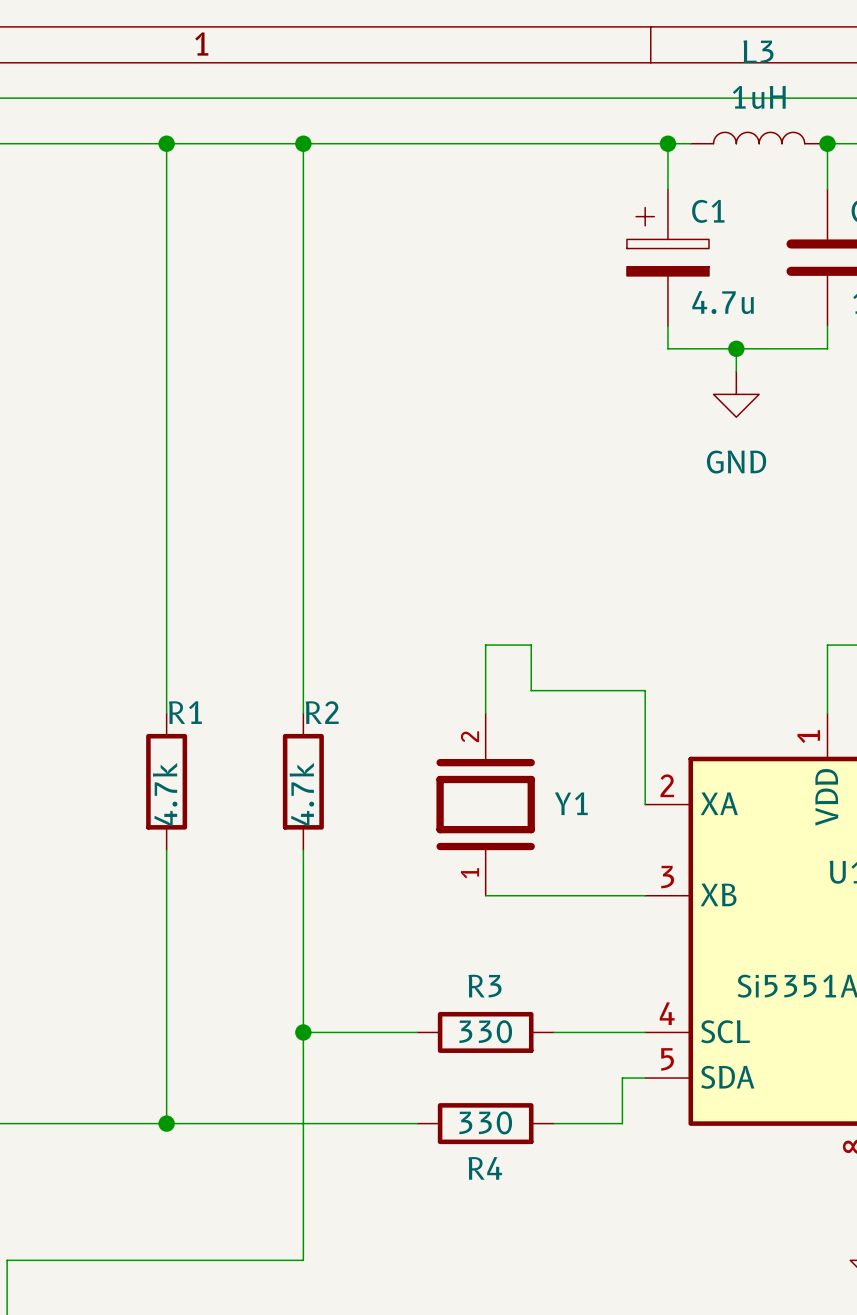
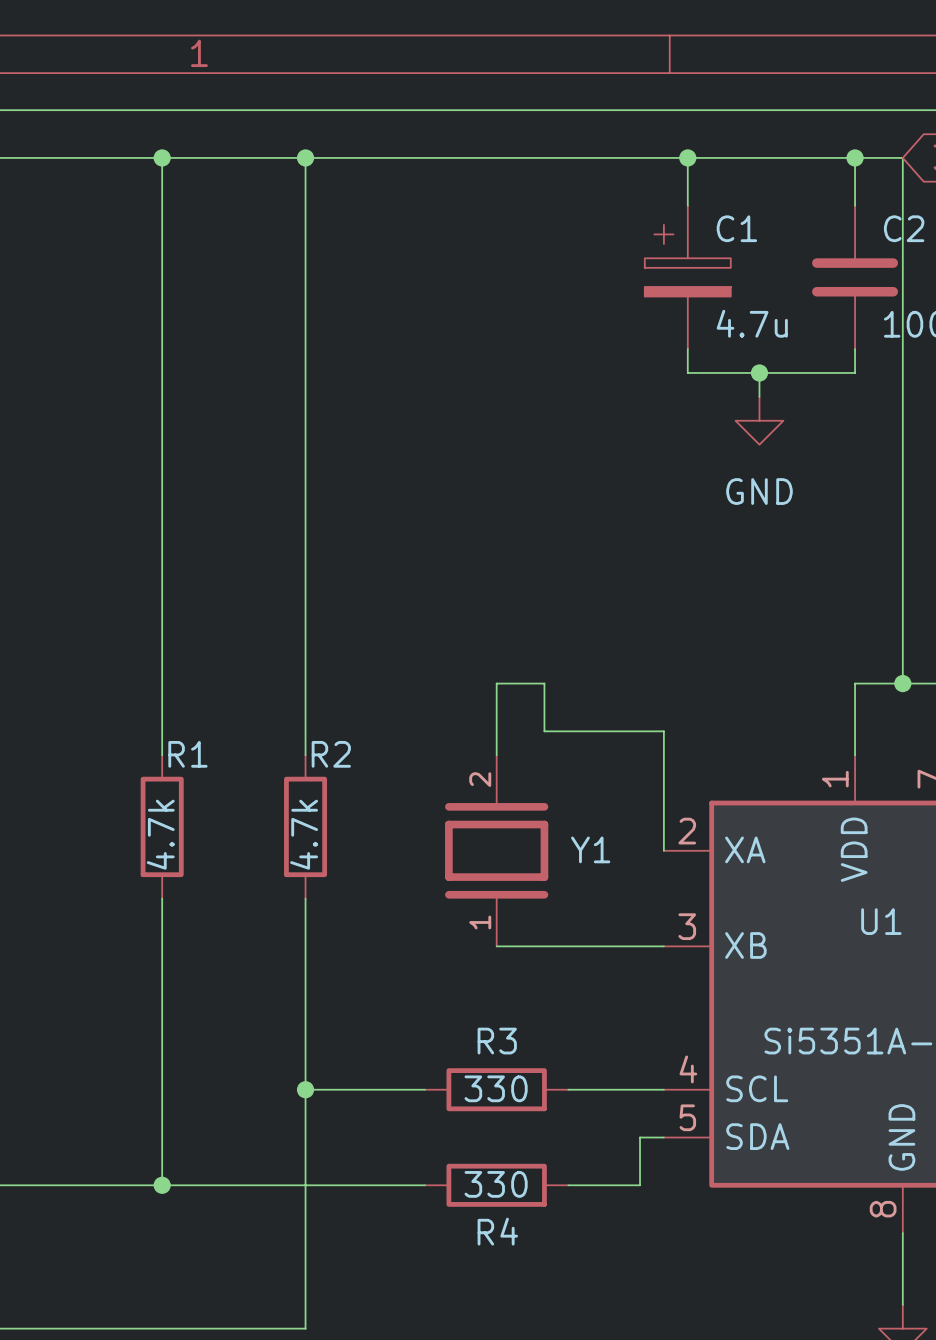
L3: 1uH (759, 138) -> none
wire: none -> (711, 157) (855, 157)

